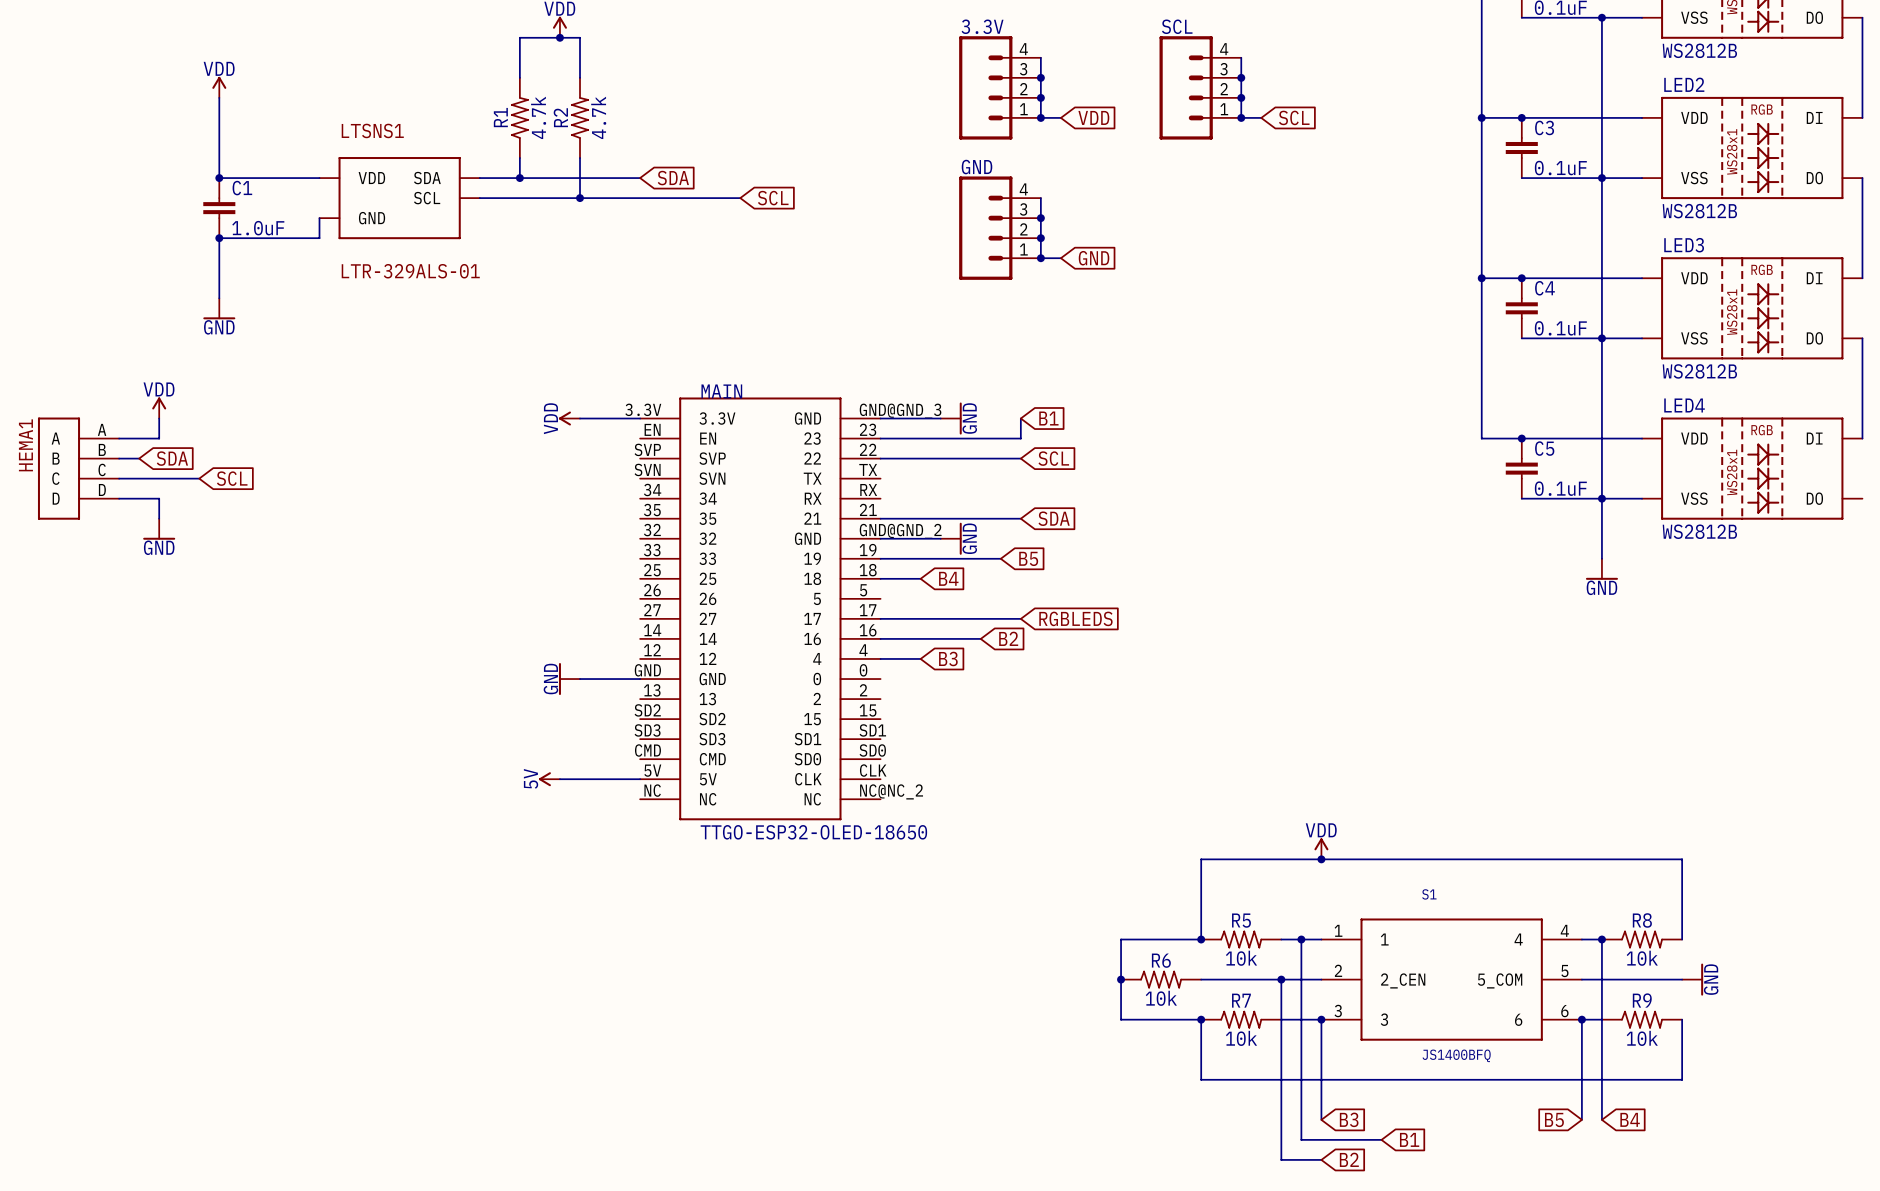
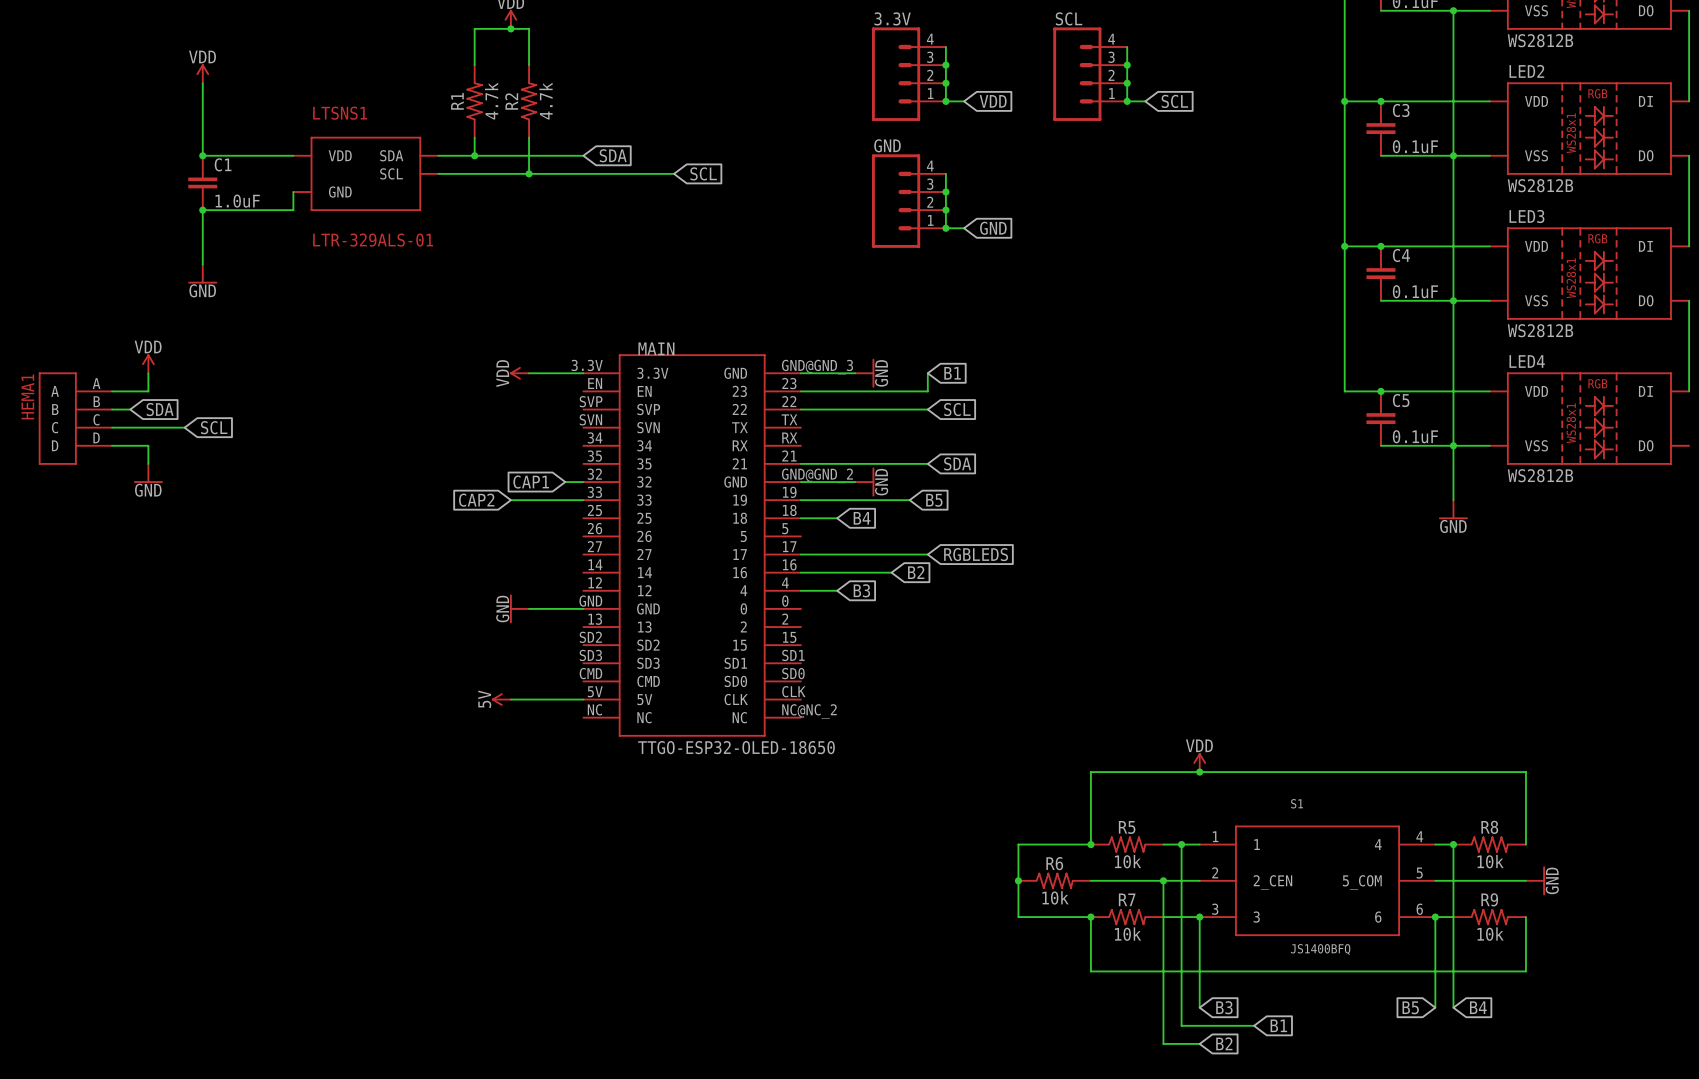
global label: none -> CAP1 (531, 482)
wire: none -> (565, 482) (583, 482)
global label: none -> CAP2 (476, 500)
wire: none -> (510, 500) (583, 500)

